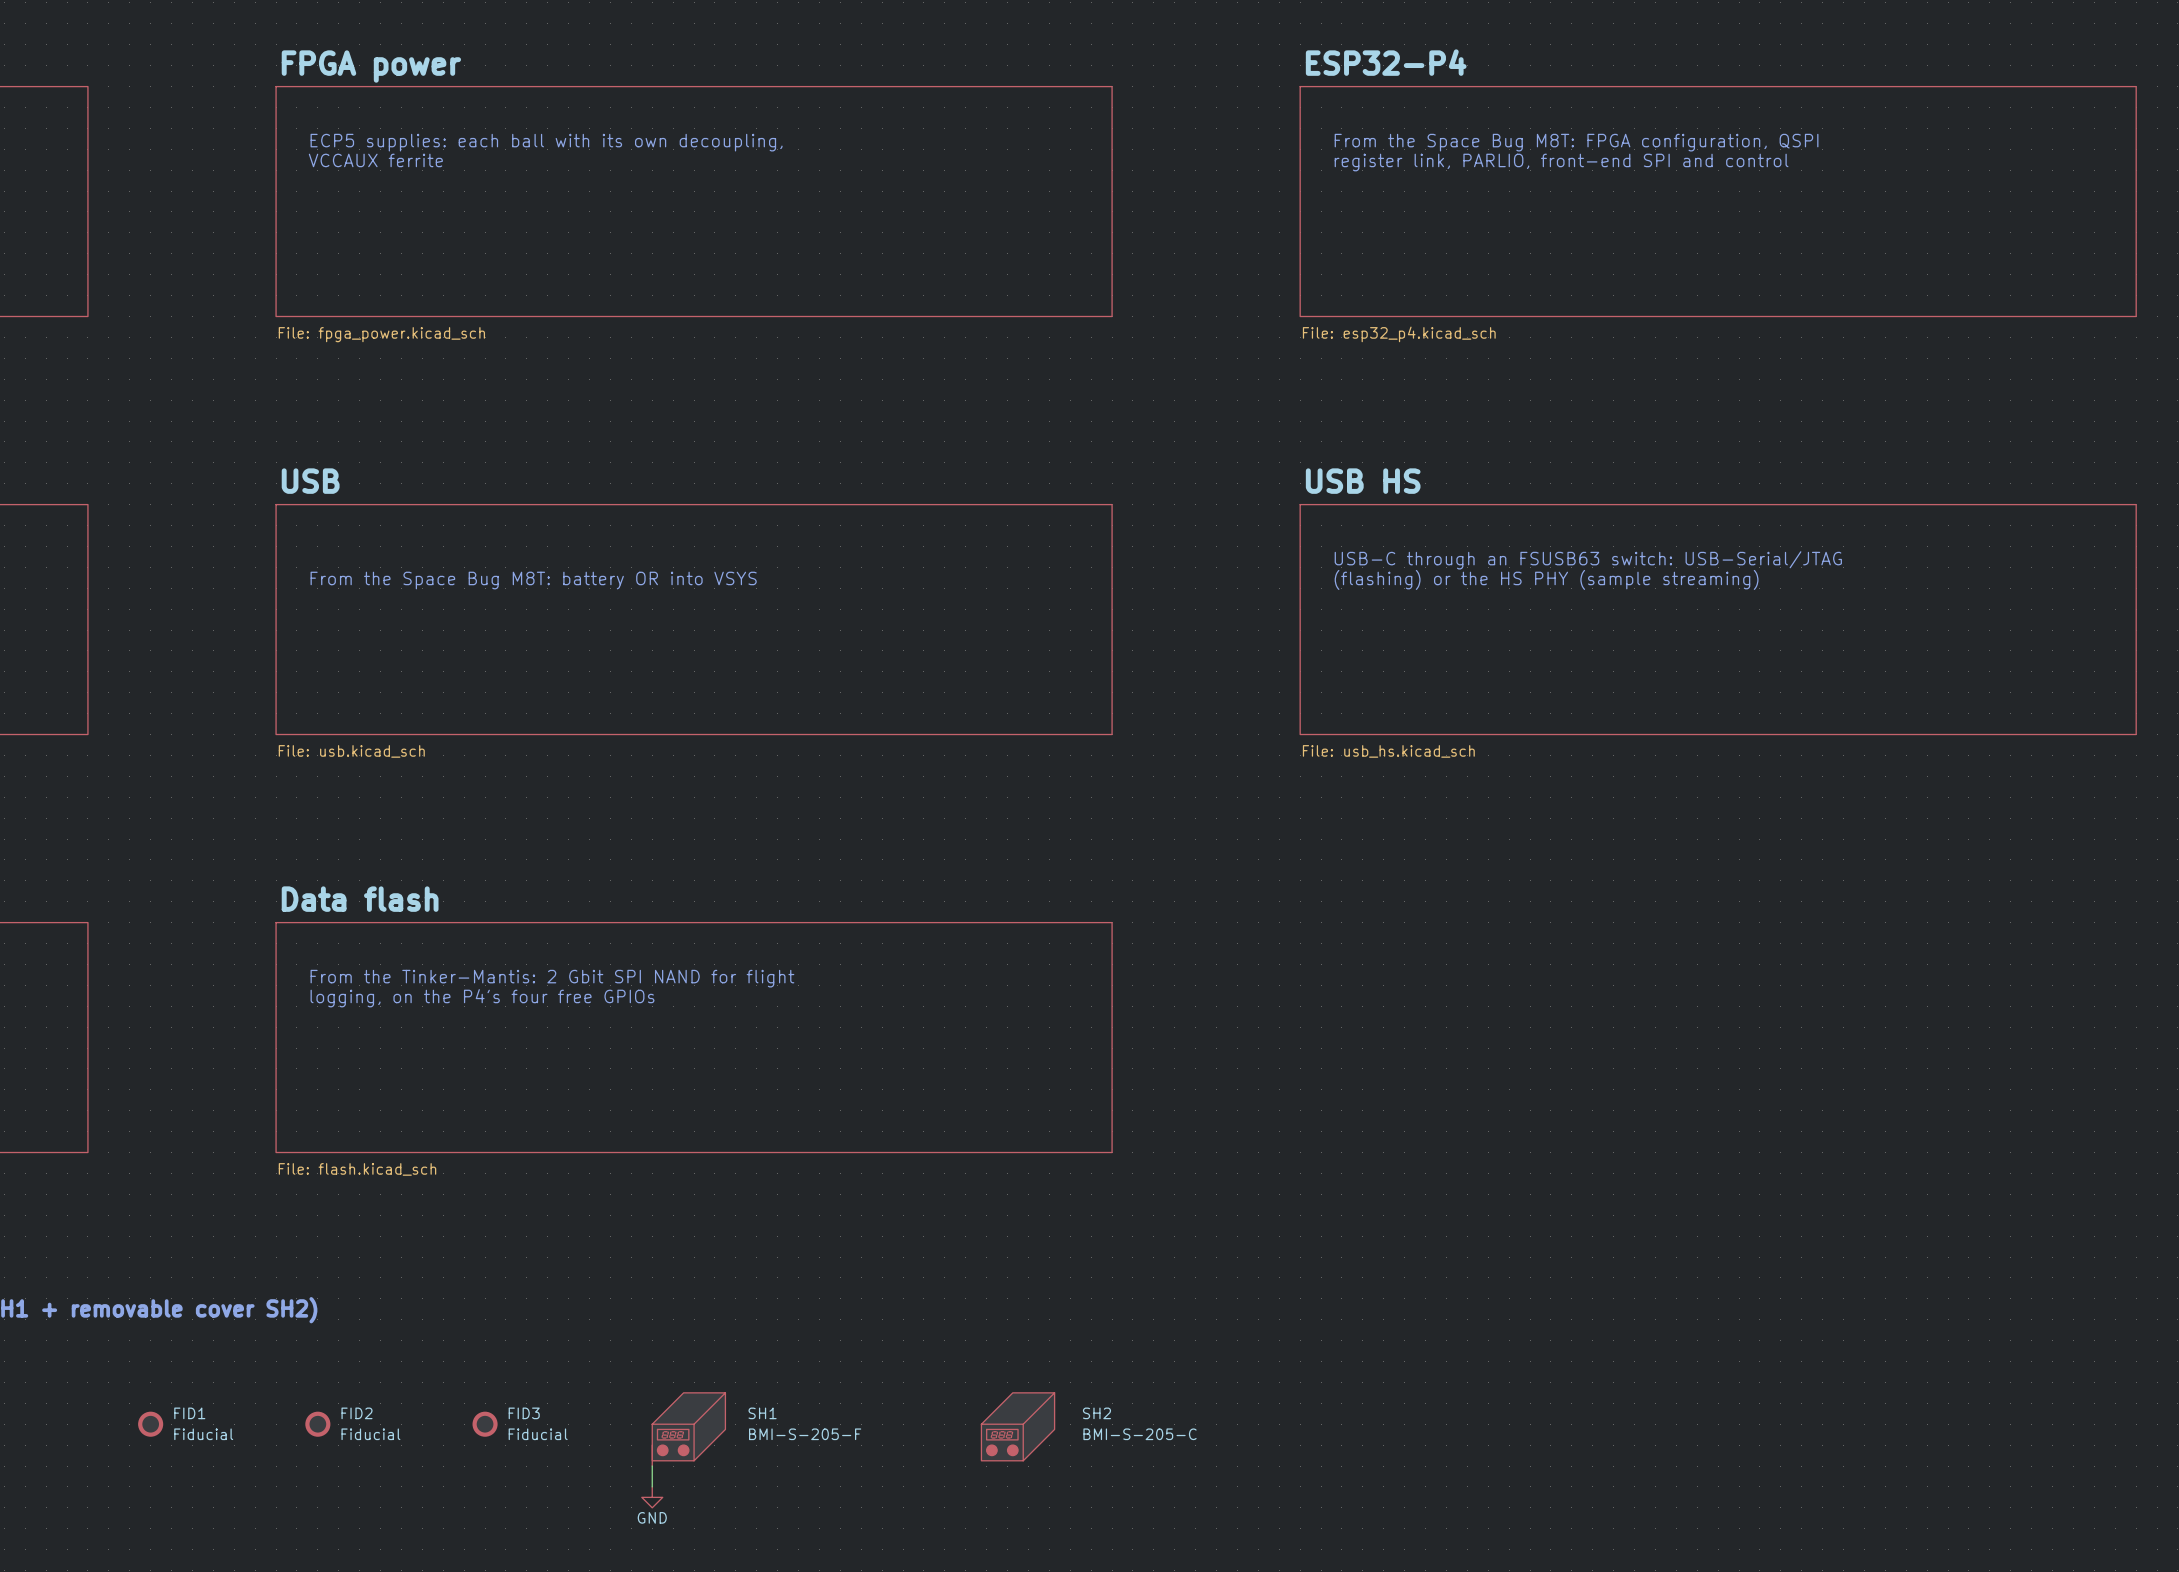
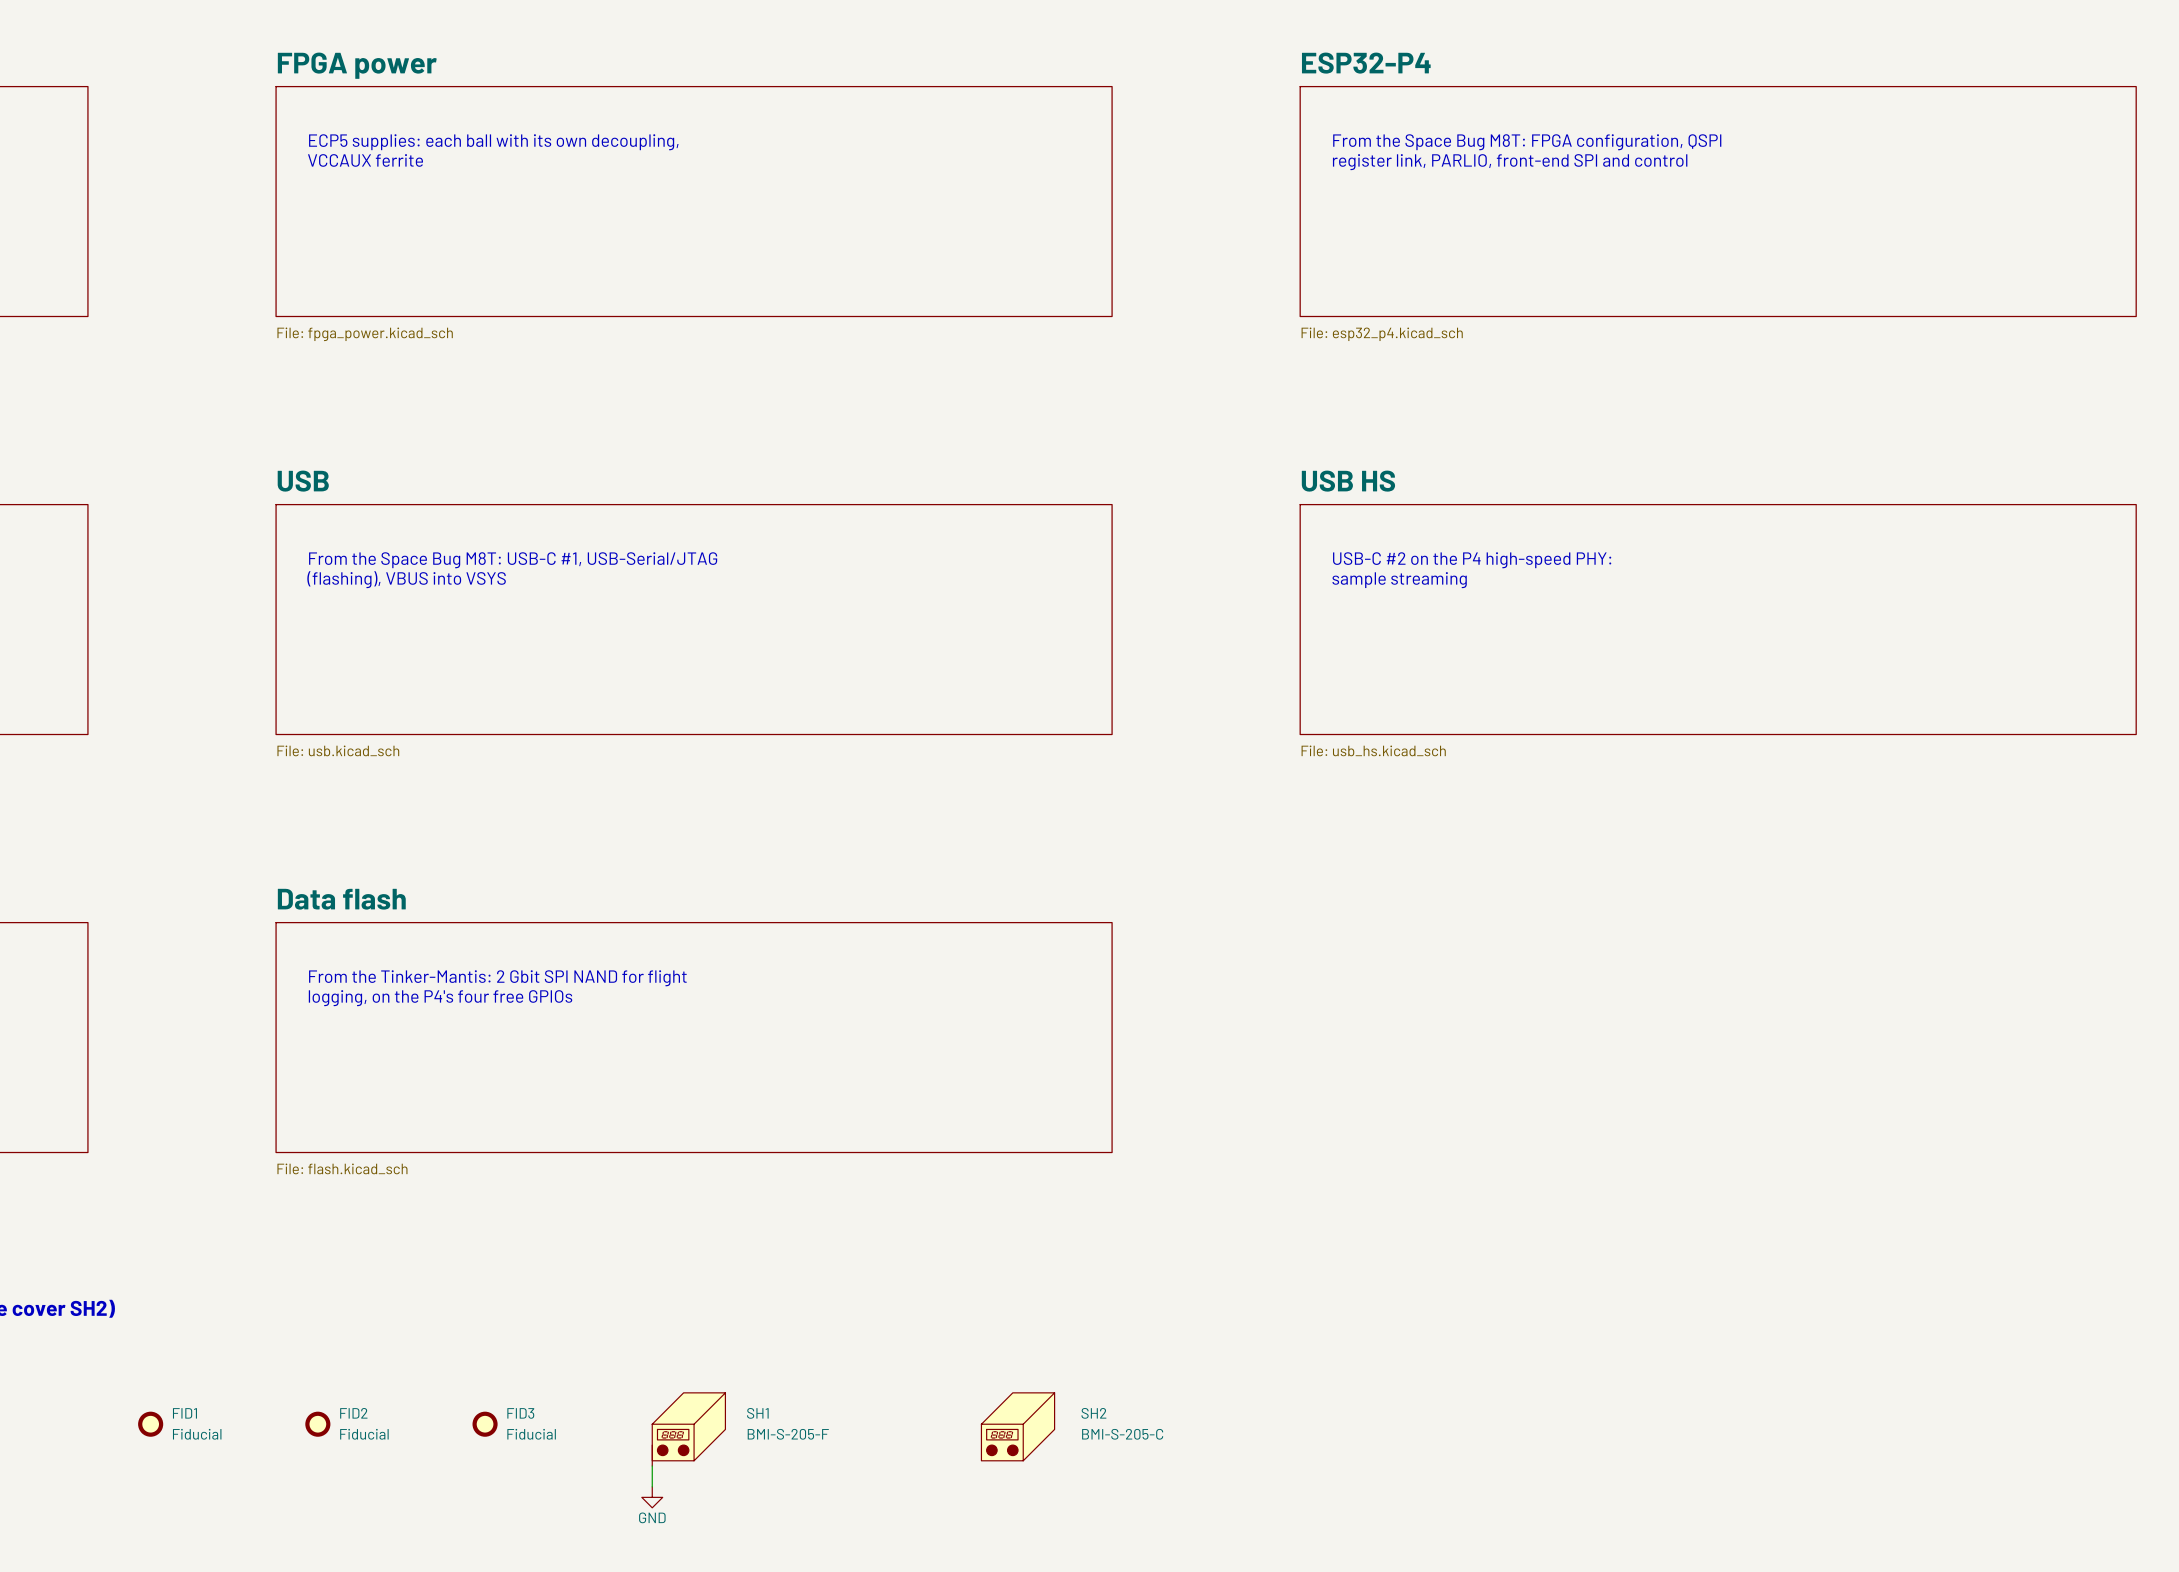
text: none -> From the Space Bug M8T: USB-C #1, USB-Serial/JTAG (513, 560)
text: USB-C through an FSUSB63 switch: USB-Serial/JTAG (1588, 560) -> USB-C #2 on the P4 high-speed PHY: (1472, 560)
text: (flashing) or the HS PHY (sample streaming) (1546, 579) -> sample streaming (1399, 580)
text: From the Space Bug M8T: battery OR into VSYS (533, 580) -> (flashing), VBUS into VSYS (406, 579)

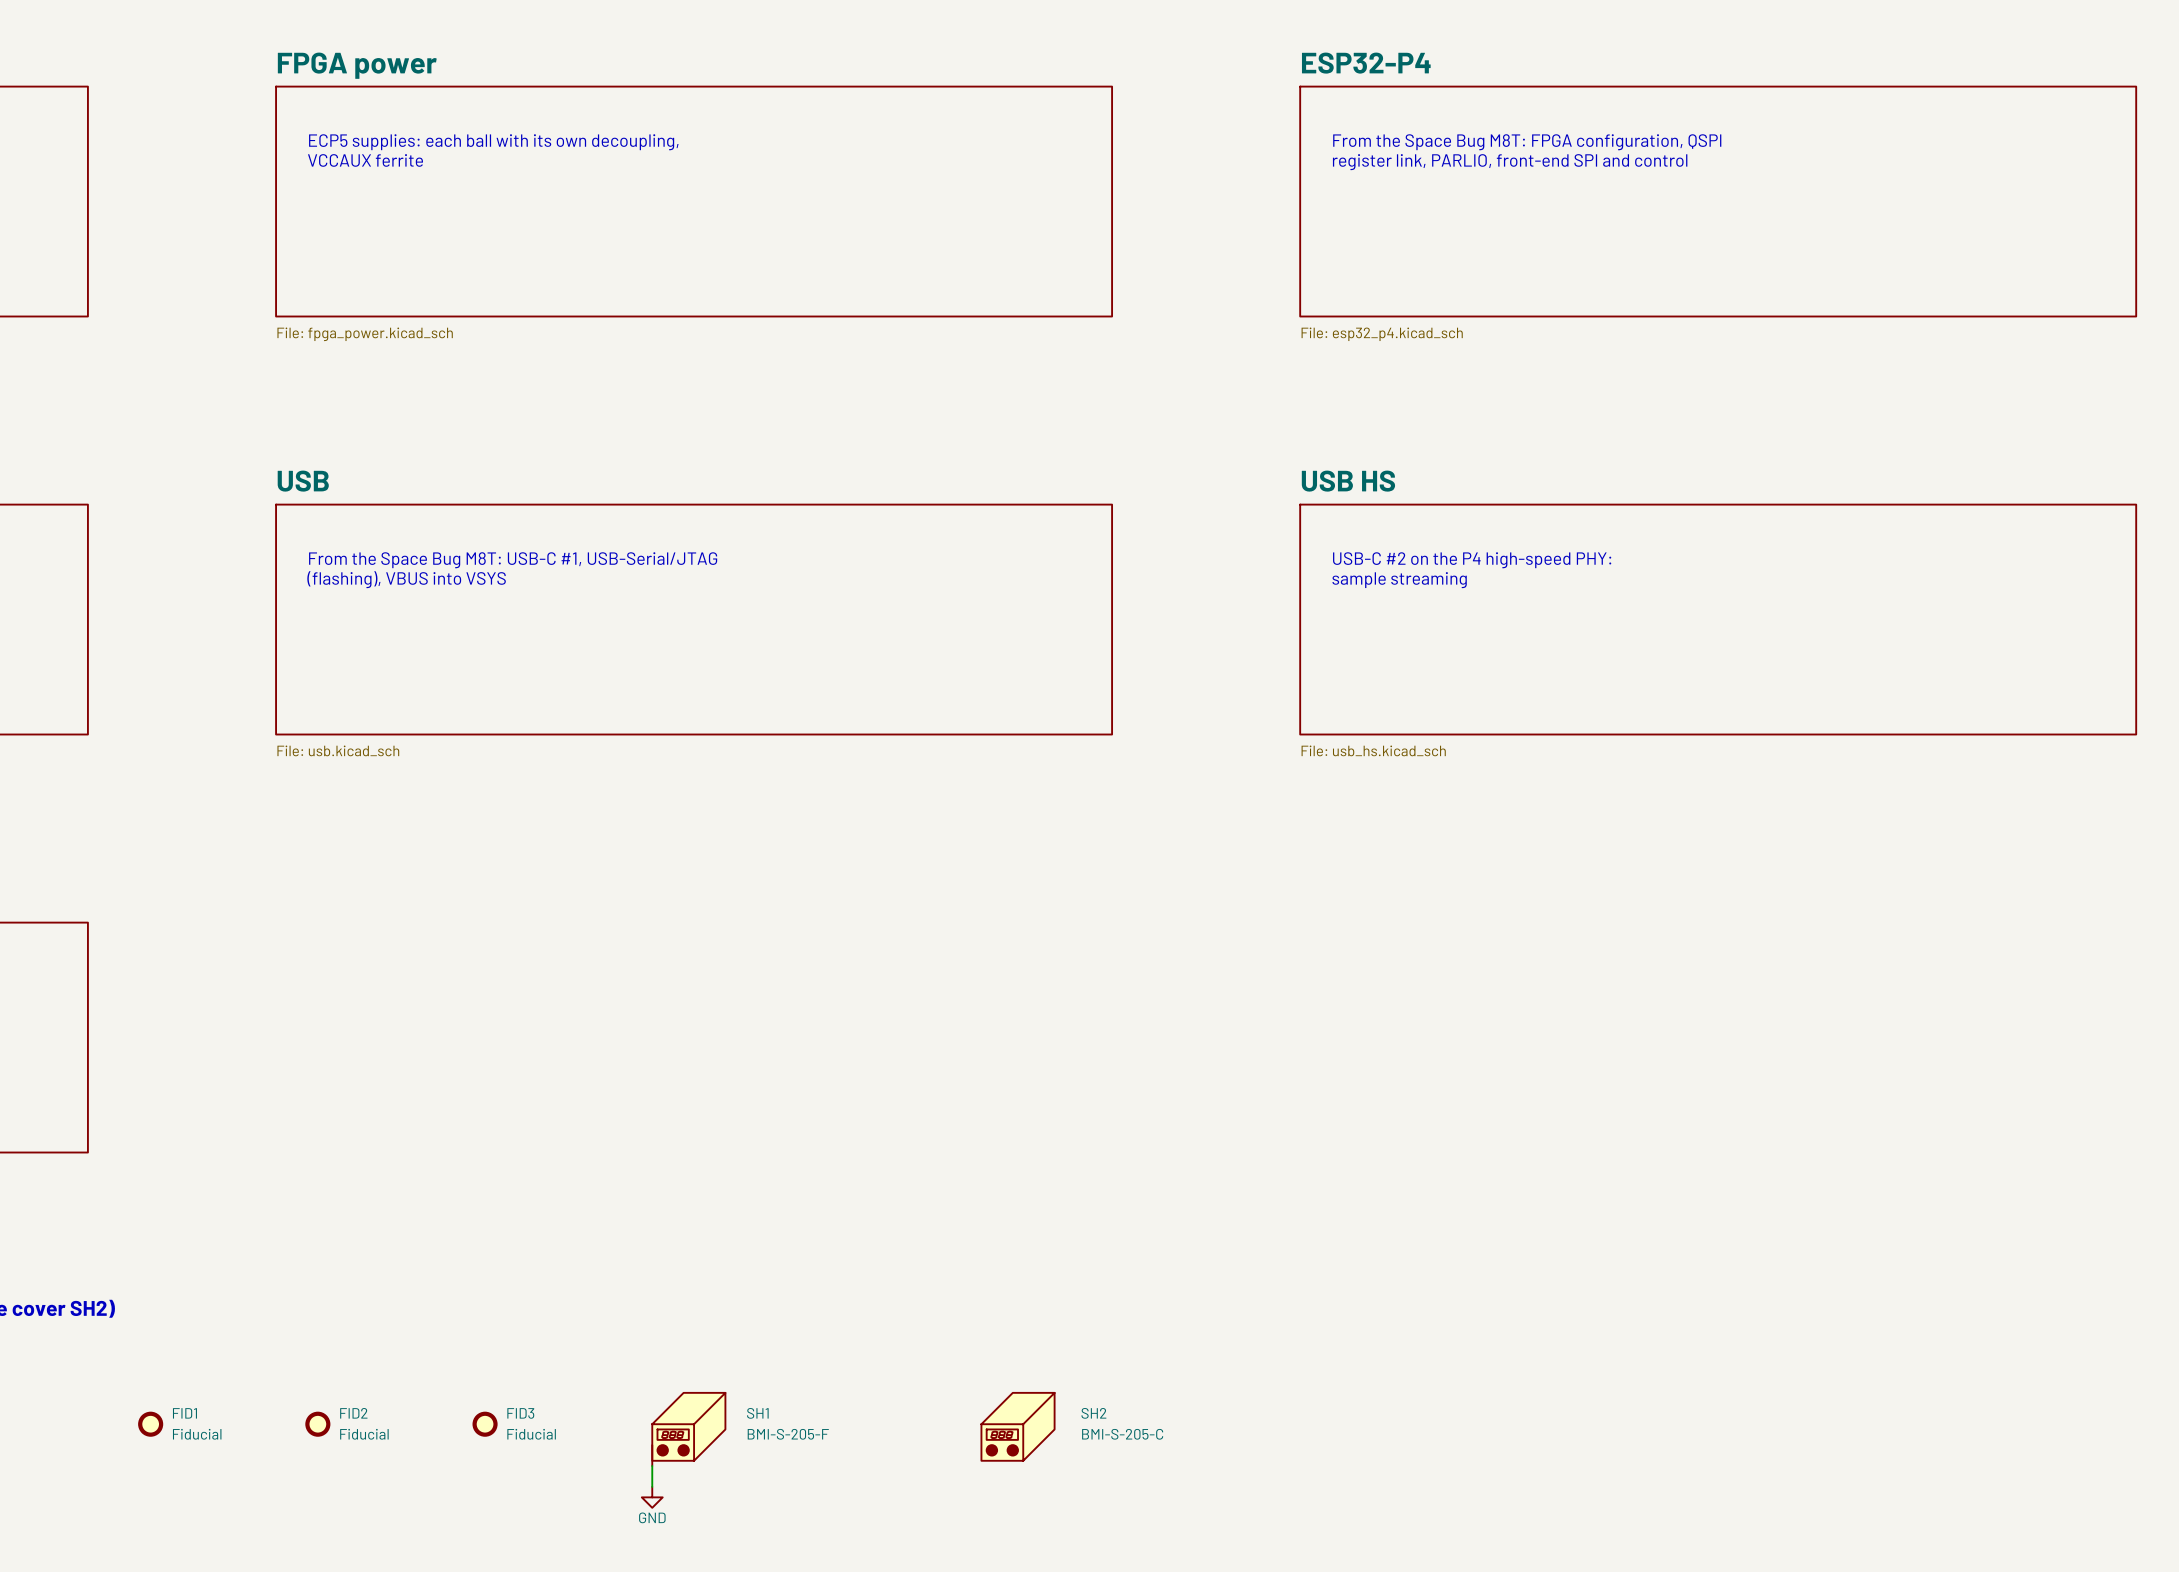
text: From the Tinker-Mantis: 2 Gbit SPI NAND for flight (497, 978) -> none
text: logging, on the P4's four free GPIOs (440, 998) -> none
sheet Data flash: File: flash.kicad_sch (694, 1037) -> none

